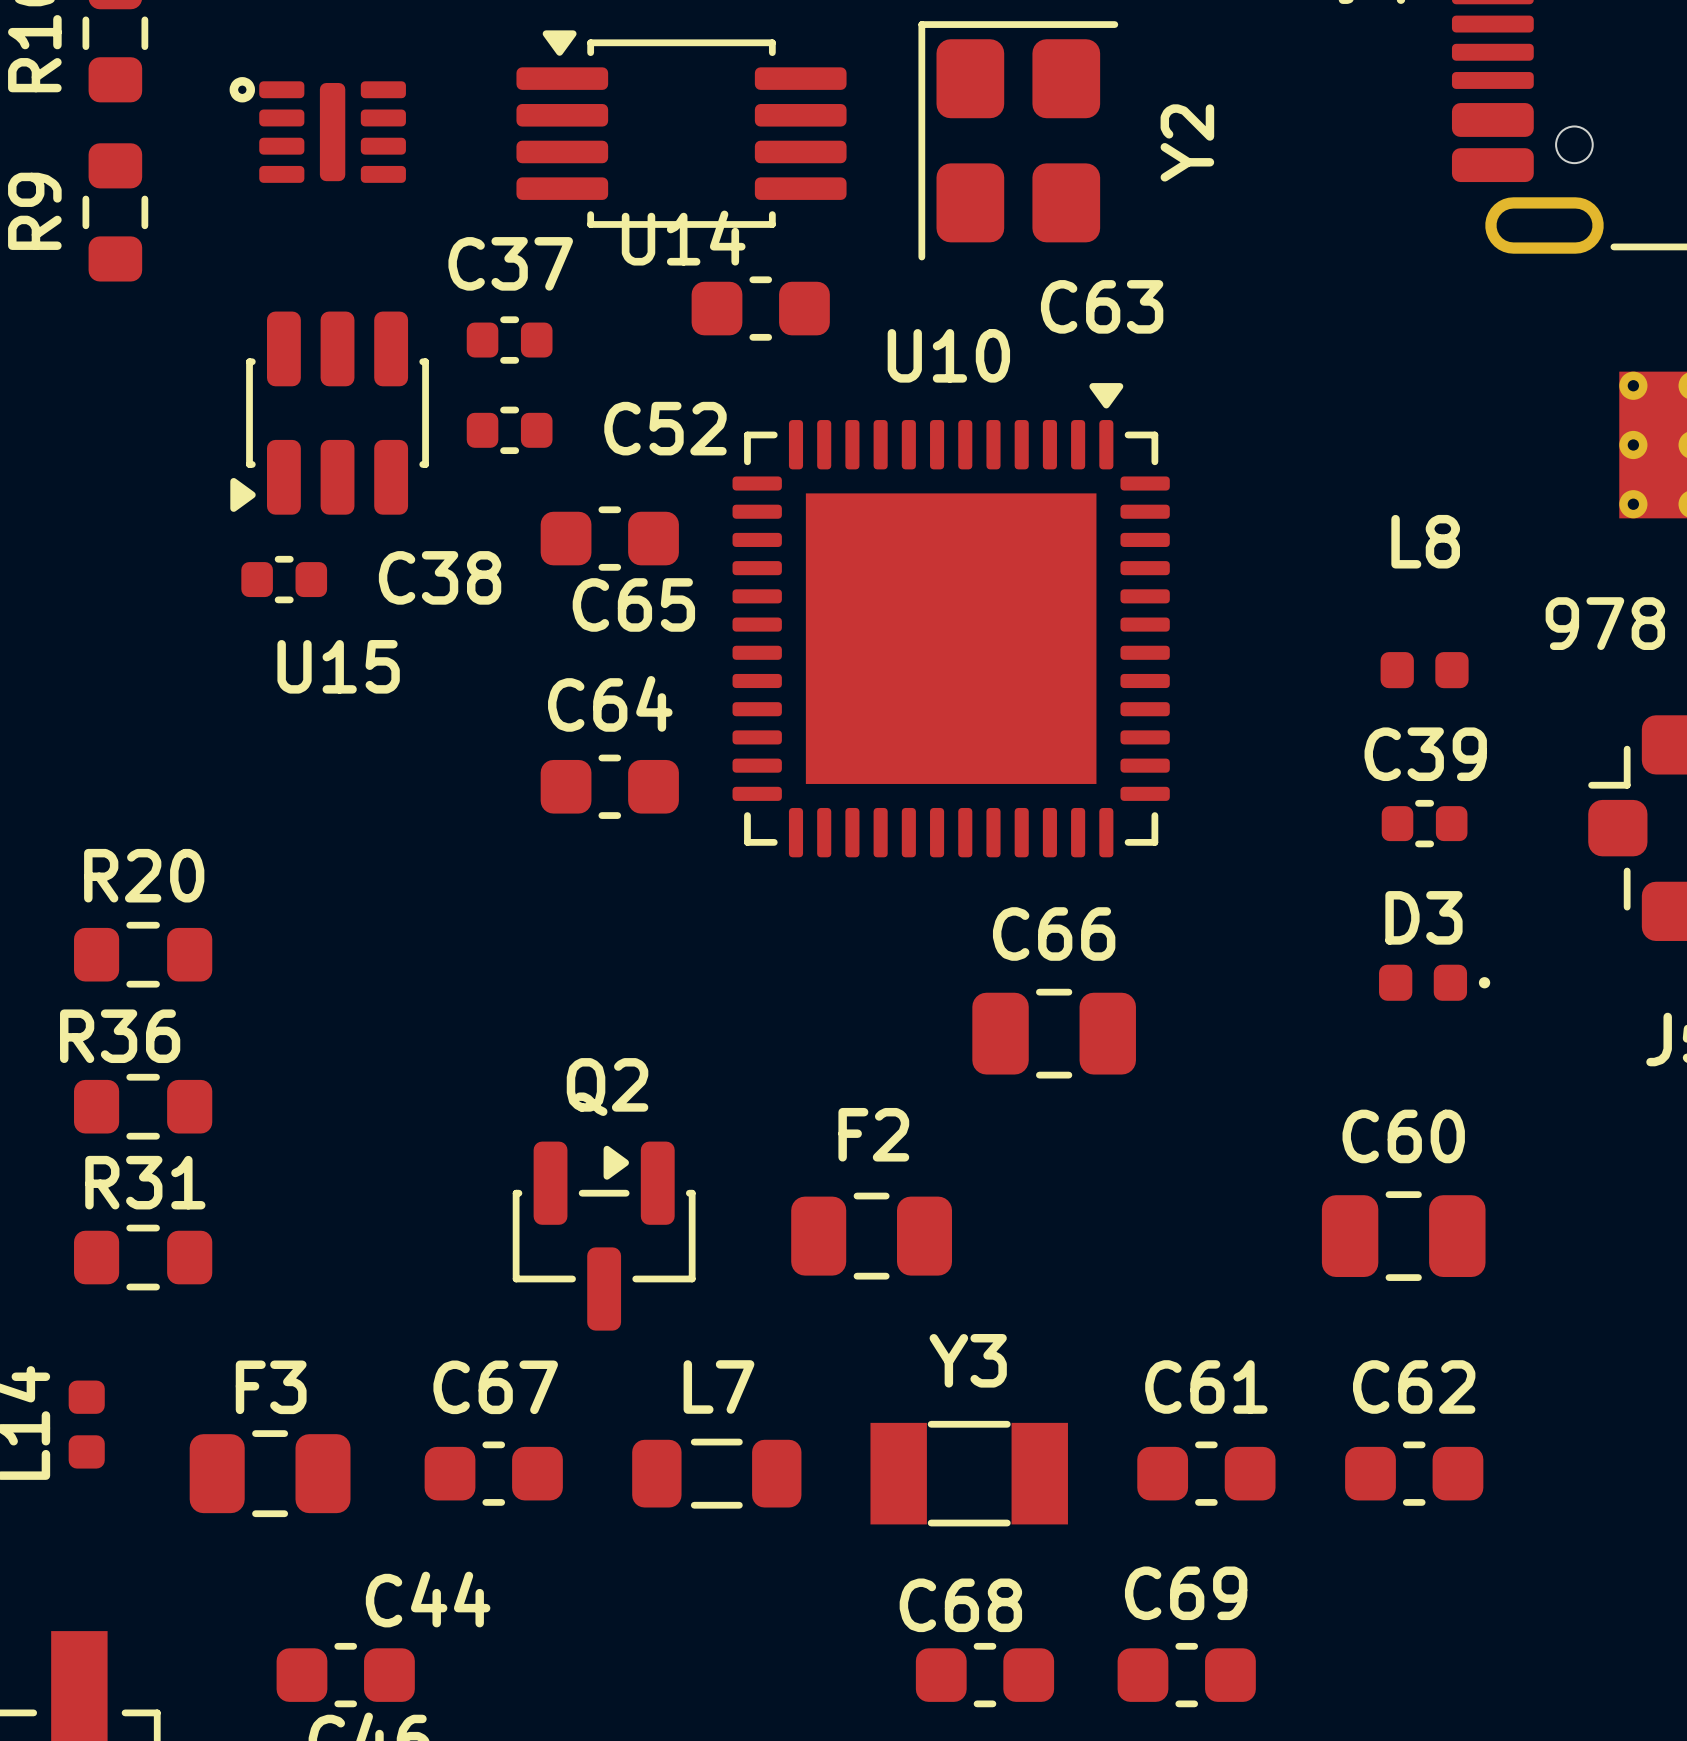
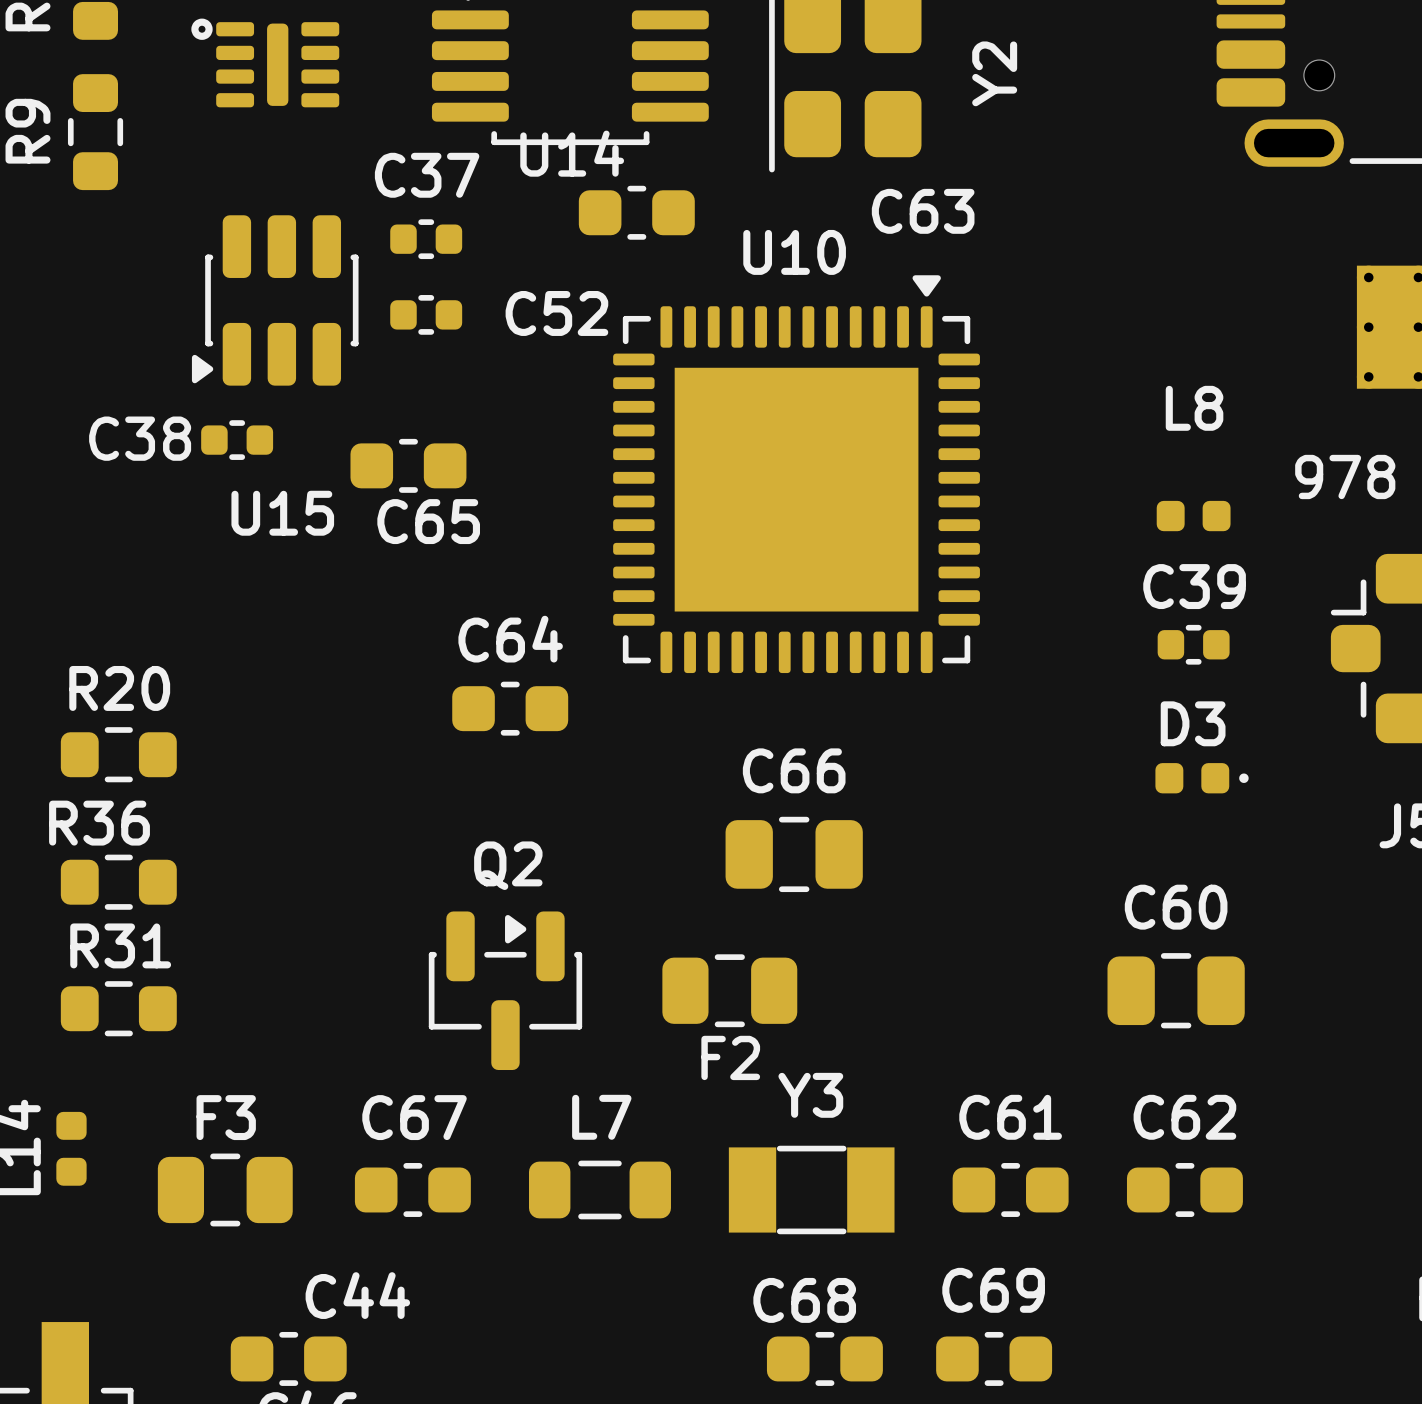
C65 position: (609, 538) -> (408, 465)
C38 name position: C38 (440, 577) -> C38 (140, 438)
C64 position: (609, 786) -> (510, 708)
C66 position: (1054, 1033) -> (794, 854)
F2 name position: F2 (873, 1134) -> F2 (730, 1057)

